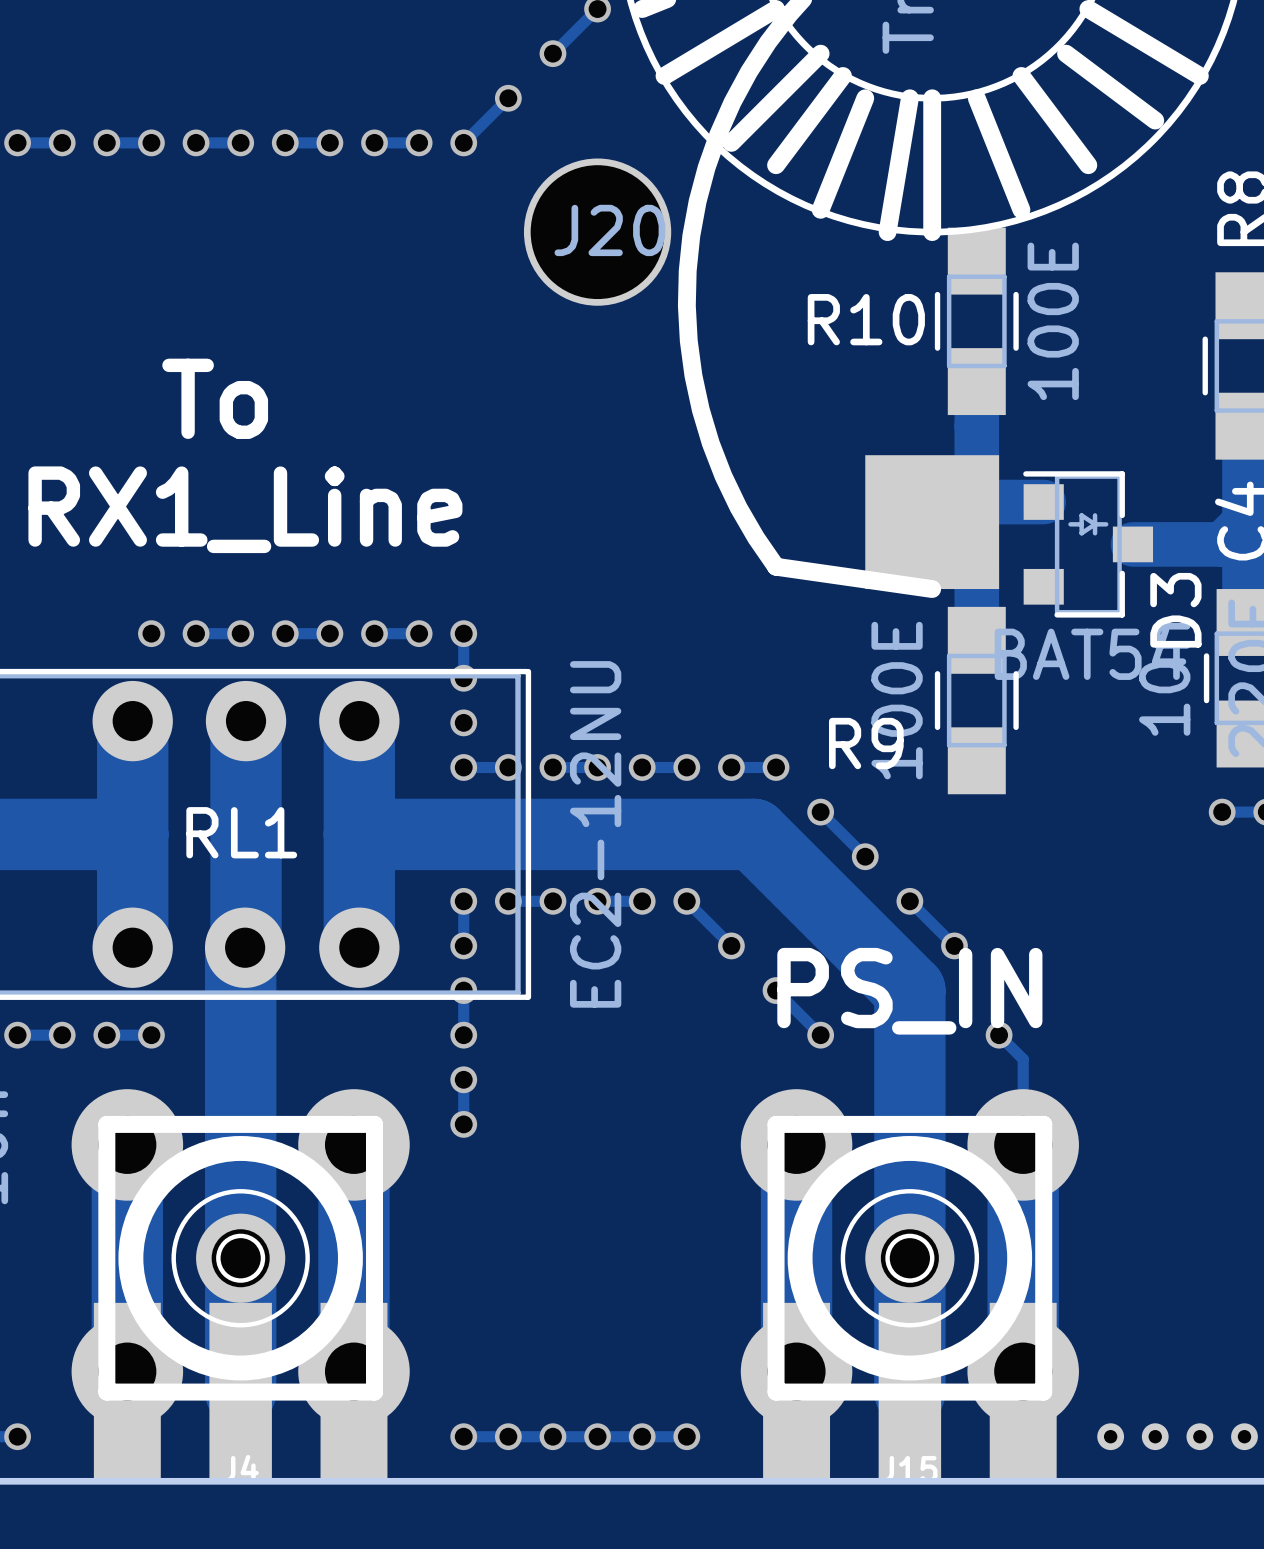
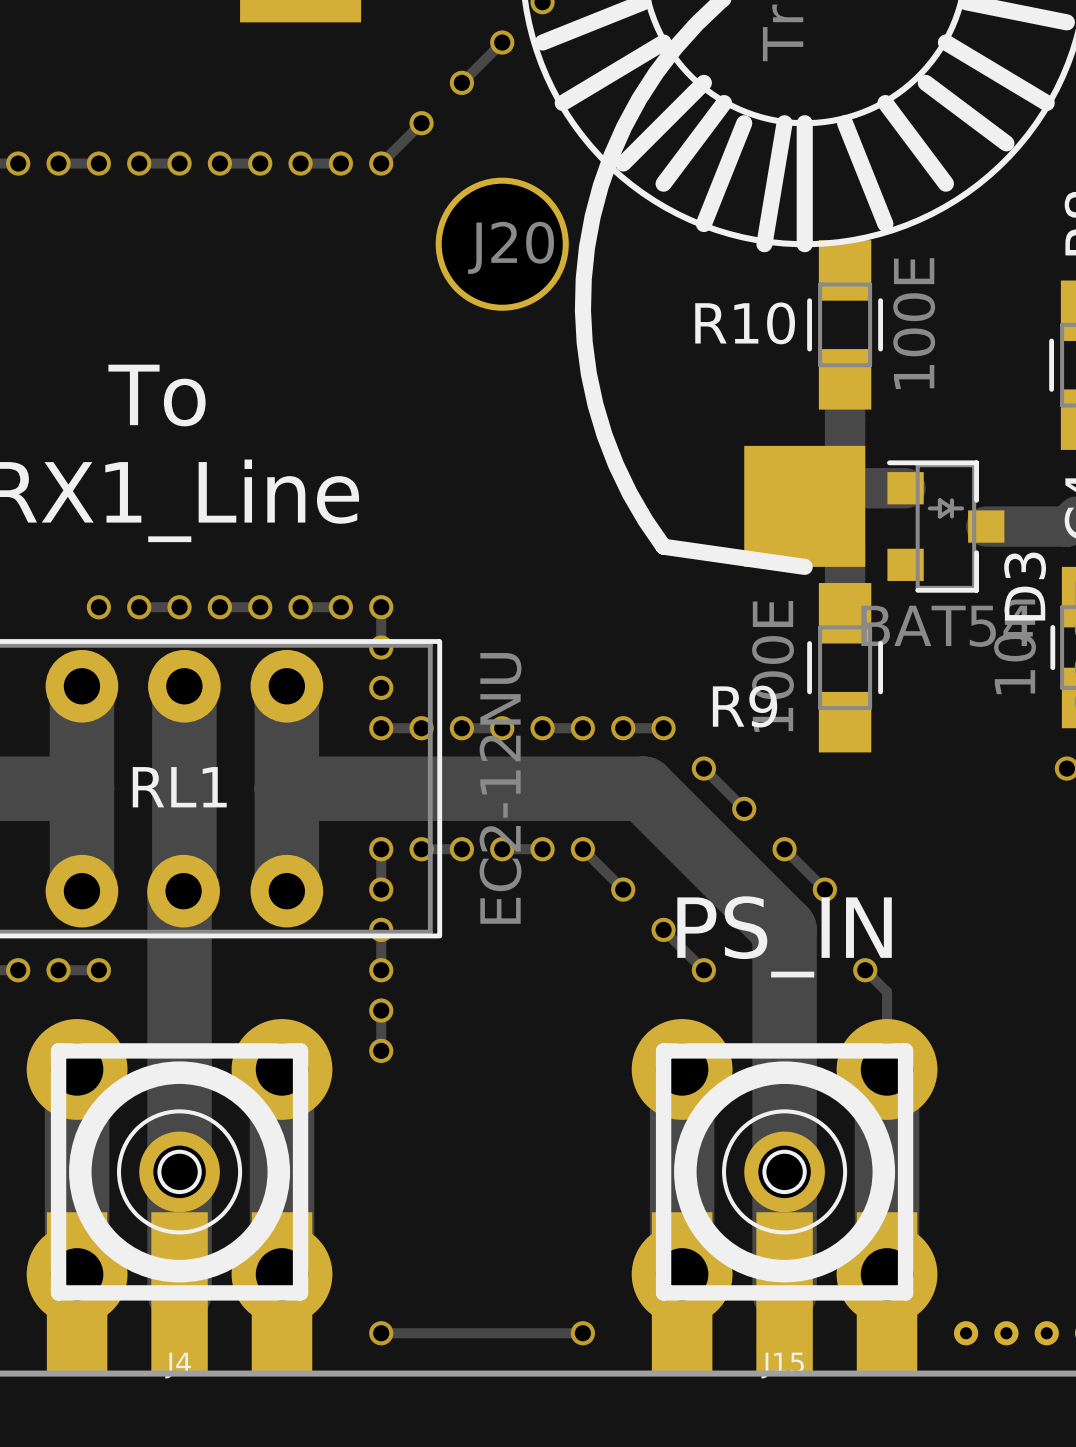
via: (508, 1436) -> none
via: (552, 1436) -> none
via: (597, 1436) -> none
via: (642, 1436) -> none

